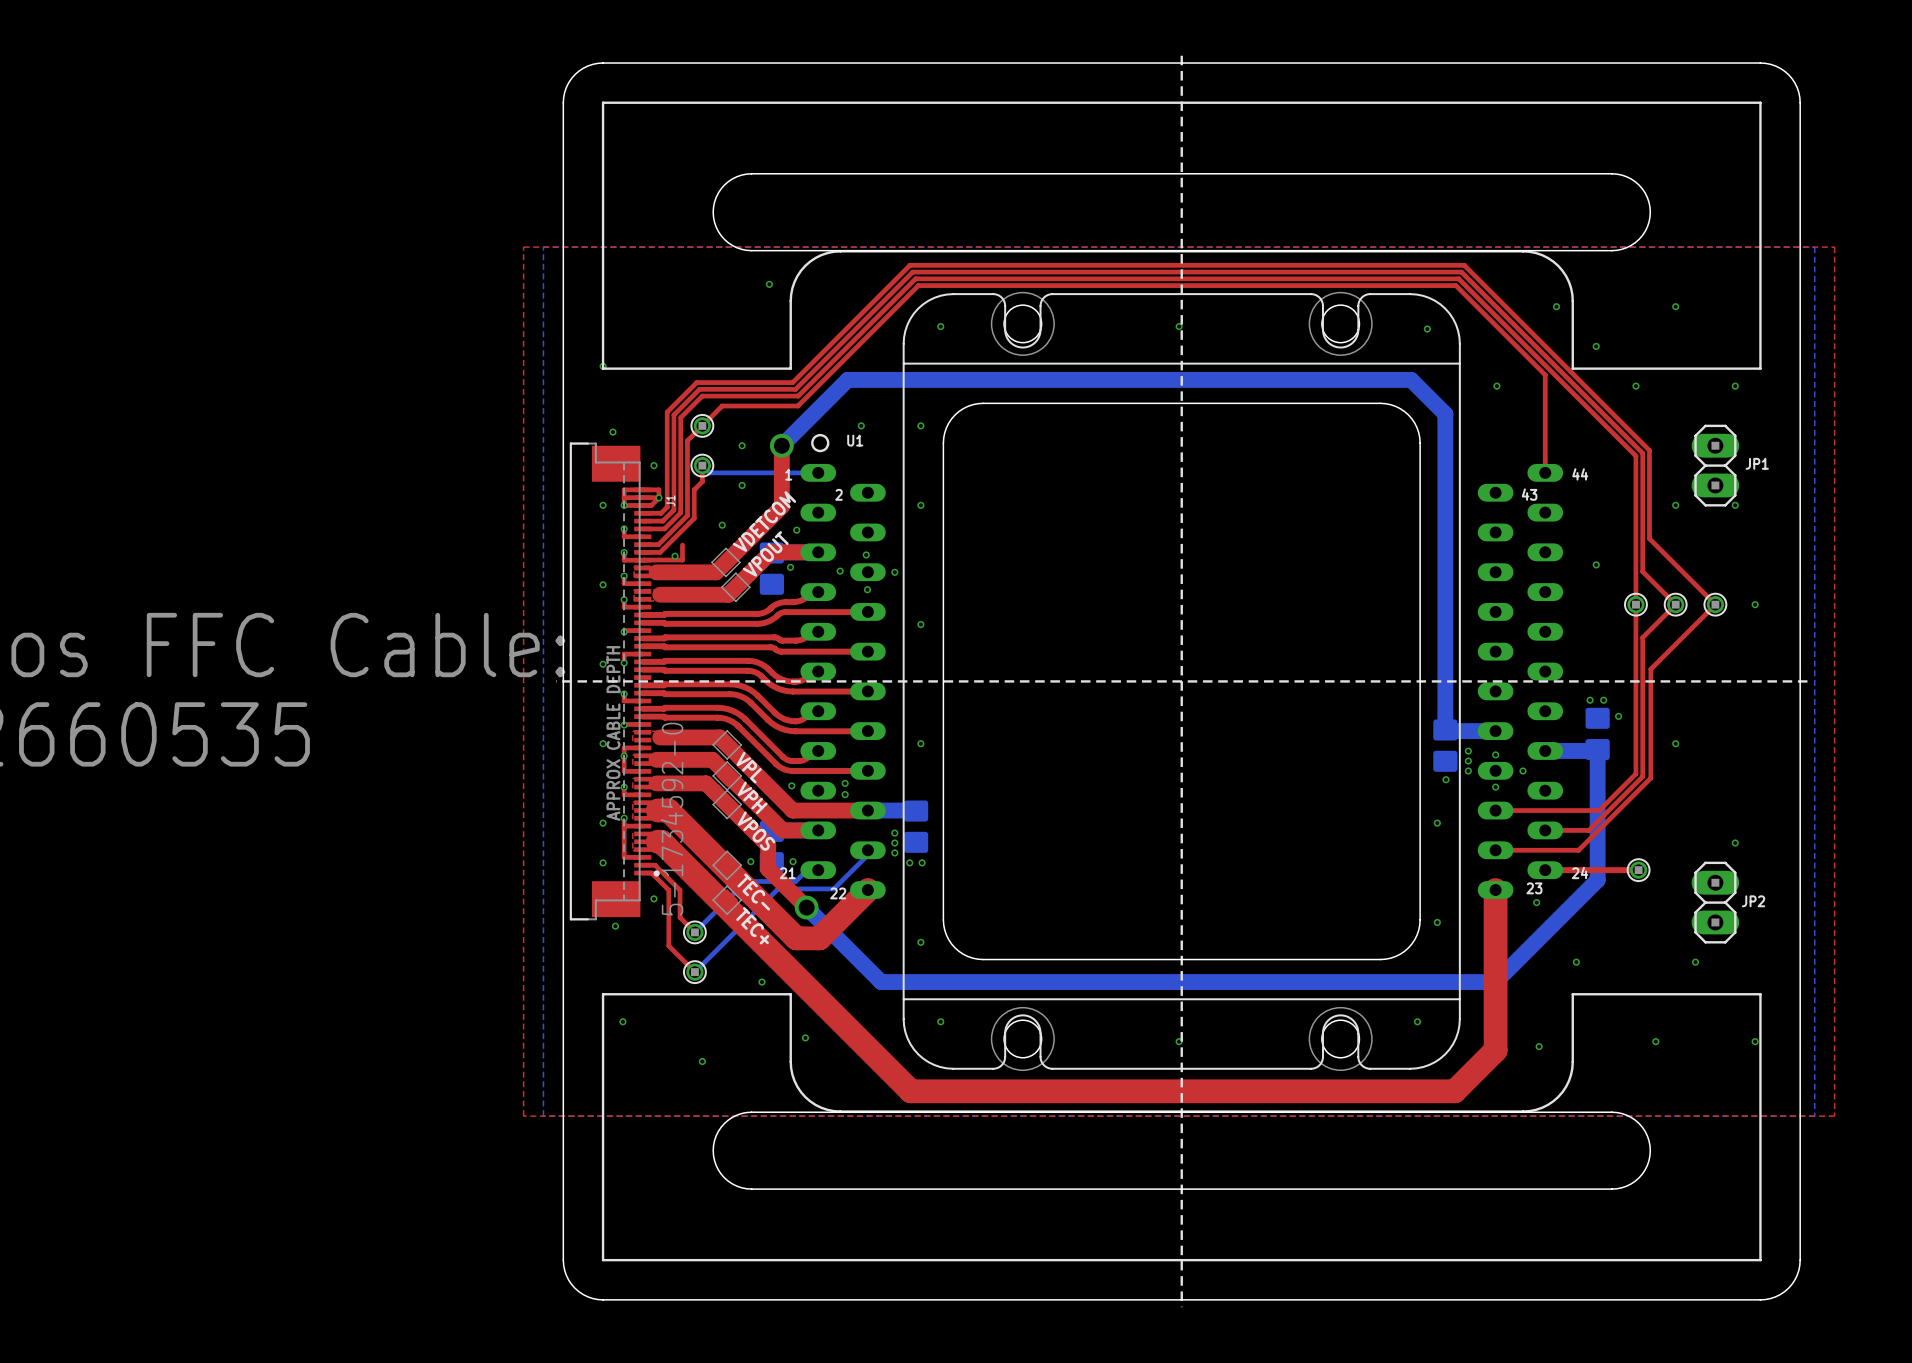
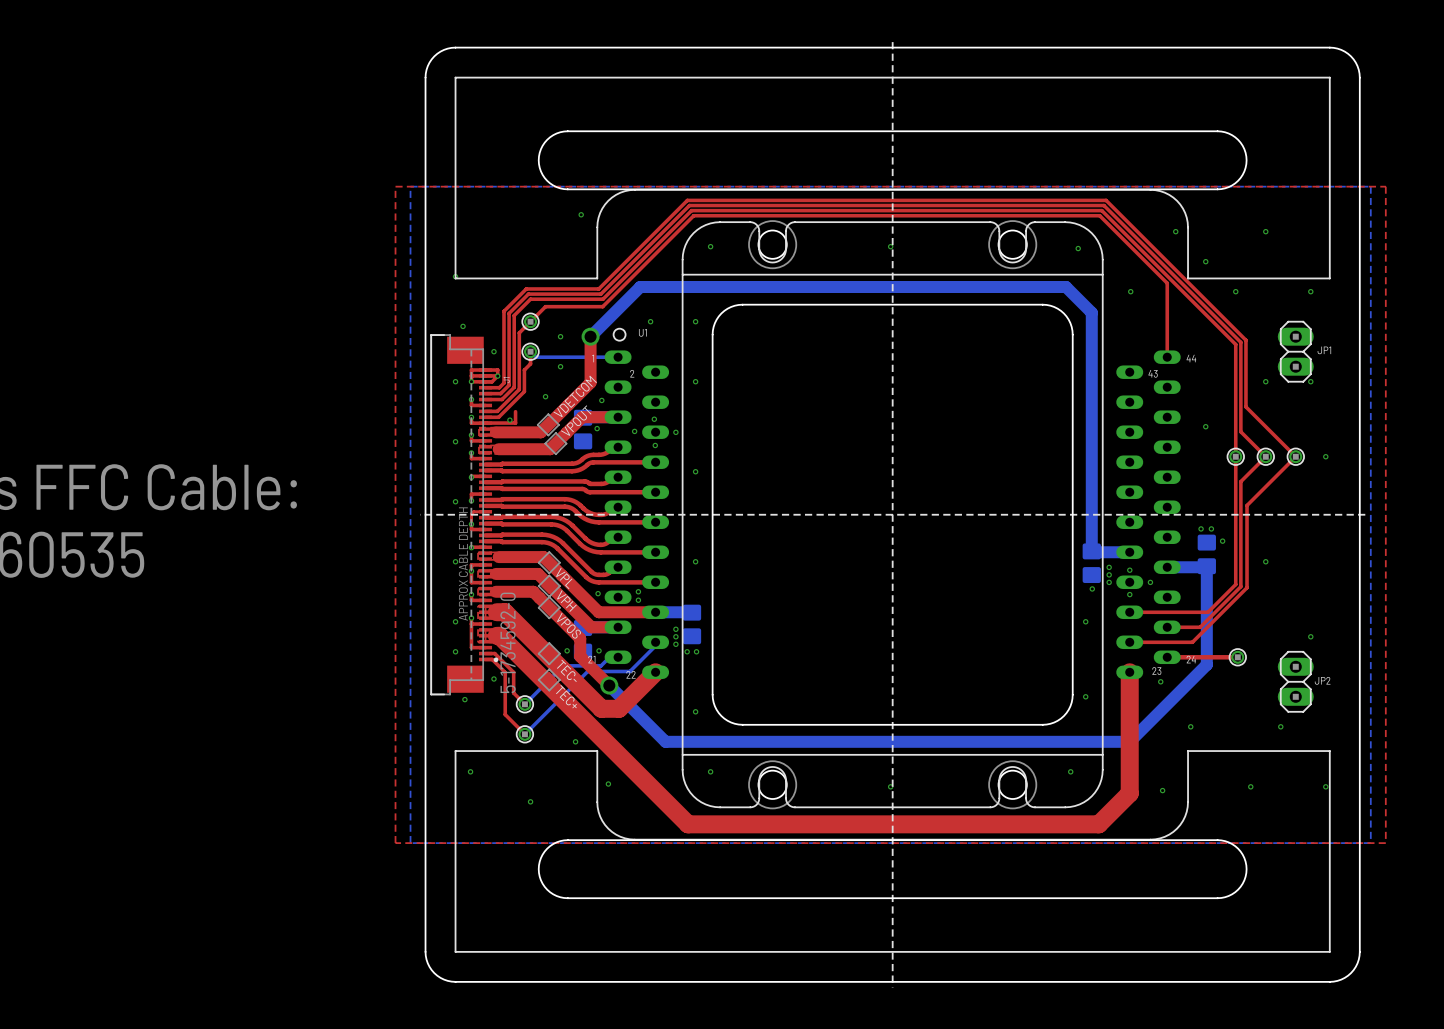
top track: none -> (485, 511) (473, 511) (471, 513) (471, 524)
top track: none -> (485, 606) (485, 618)
top track: none -> (485, 629) (485, 641)

